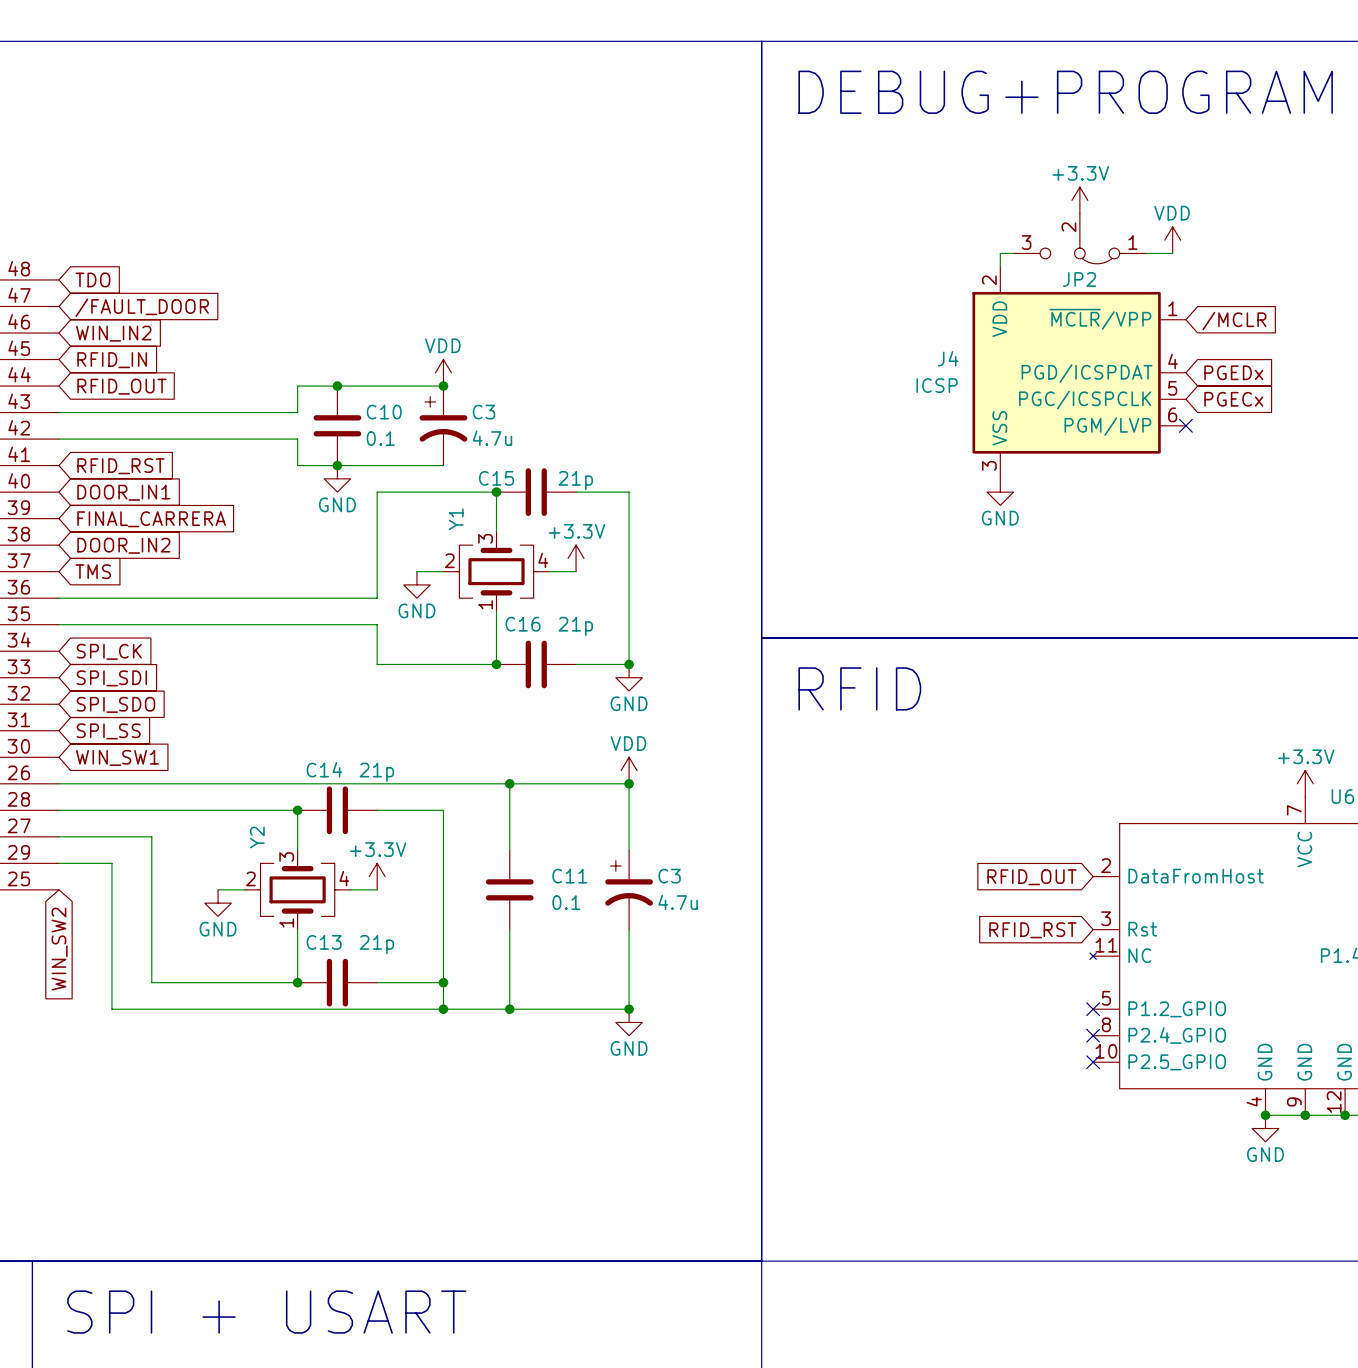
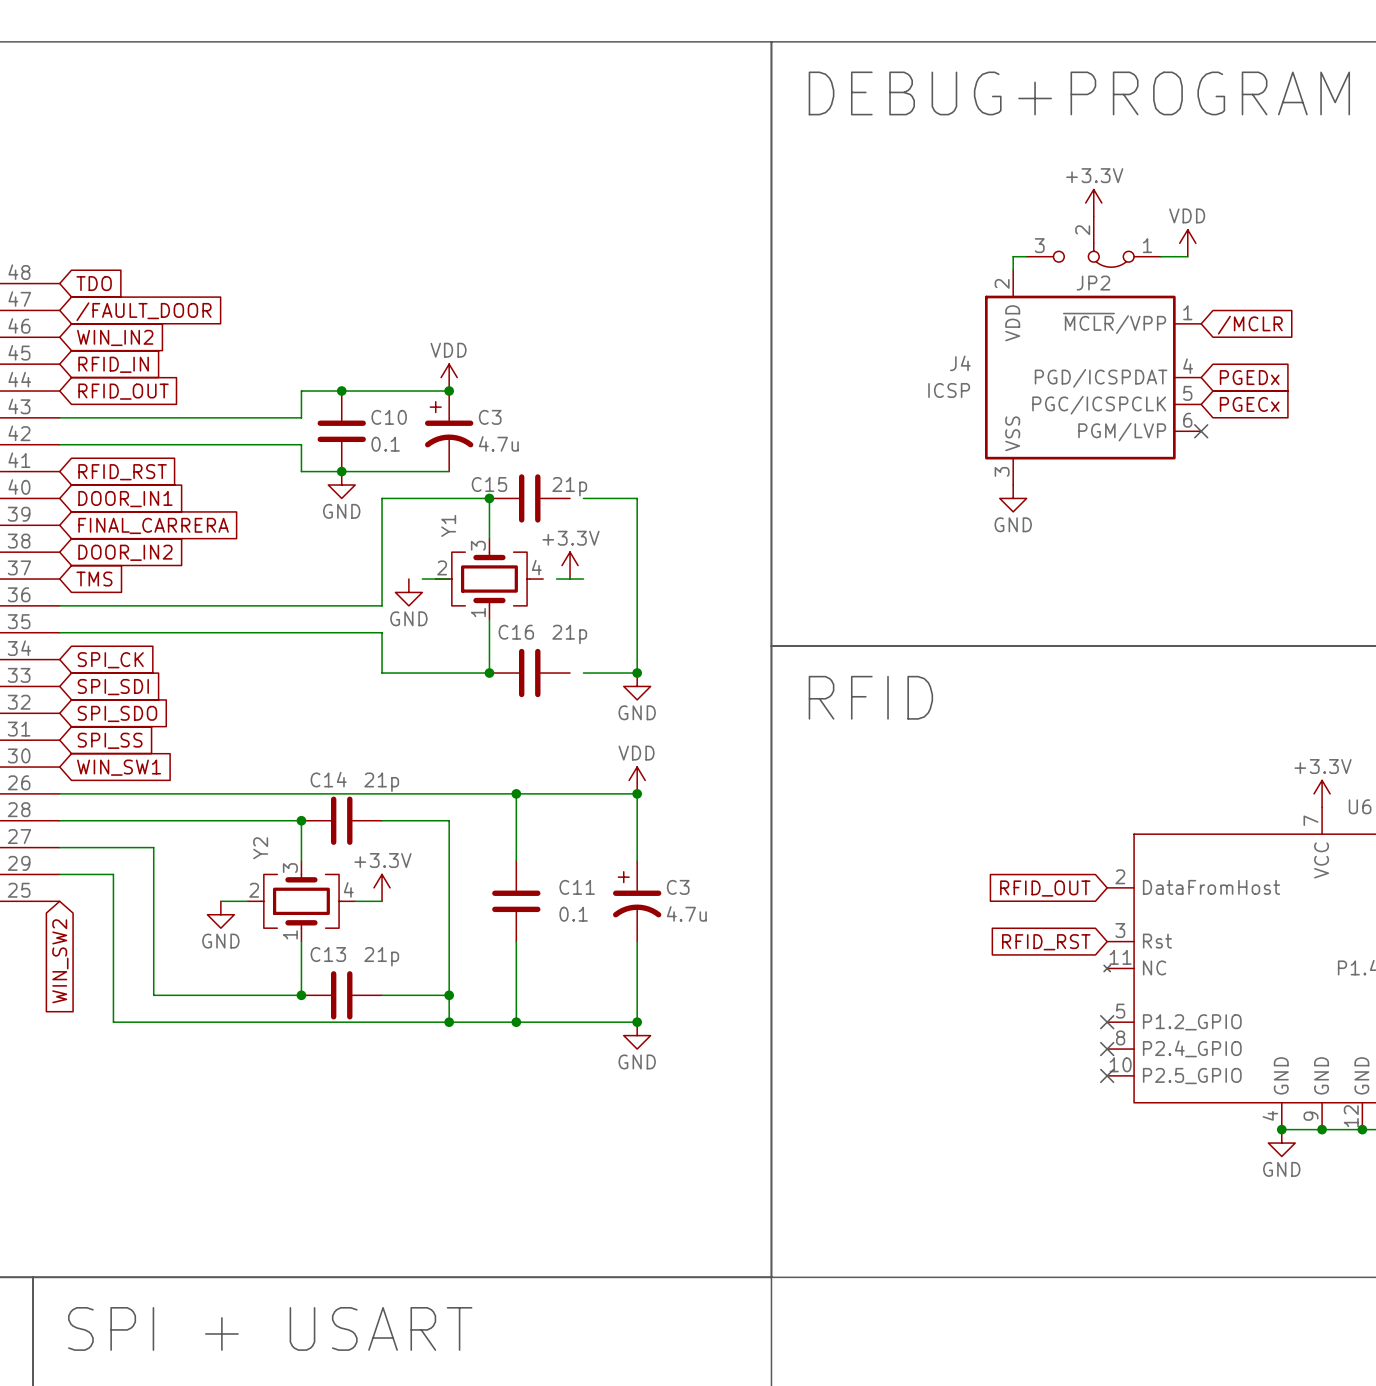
wire: (483, 492) (496, 492) (496, 531) -> (489, 498) (489, 538)
junction position: (496, 492) -> (489, 498)
C15 position: (536, 492) -> (529, 498)
power symbol position: +3.3V (576, 558) -> +3.3V (570, 565)
Y1 position: (496, 571) -> (489, 579)
power symbol position: GND (416, 584) -> GND (408, 592)
wire: (496, 611) (496, 664) (483, 664) -> (489, 619) (489, 673)
junction position: (496, 664) -> (489, 673)
C16 position: (536, 664) -> (529, 673)

